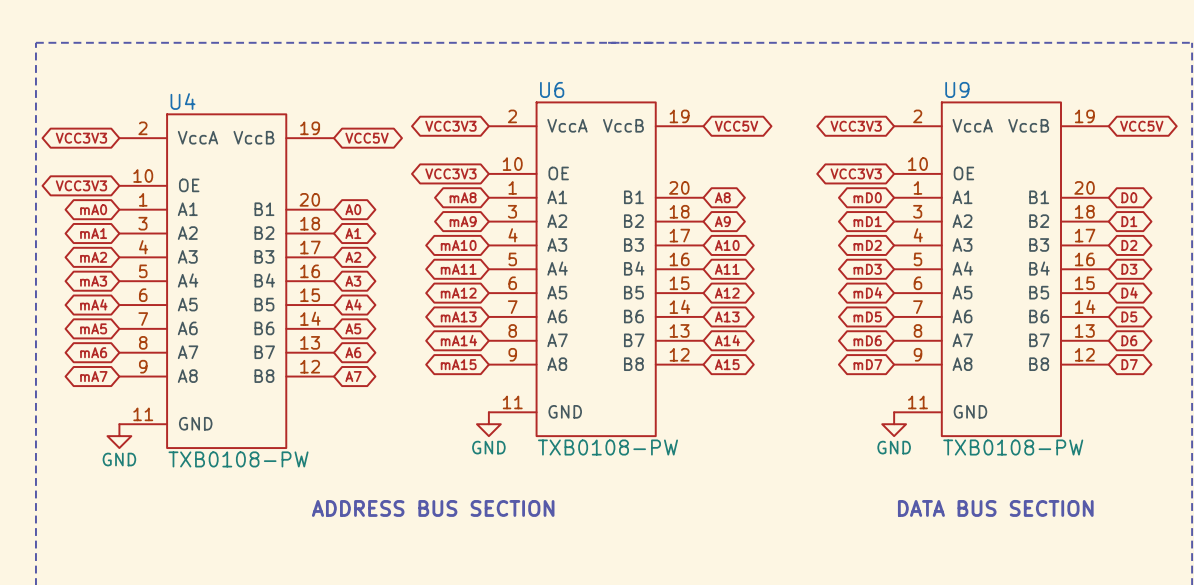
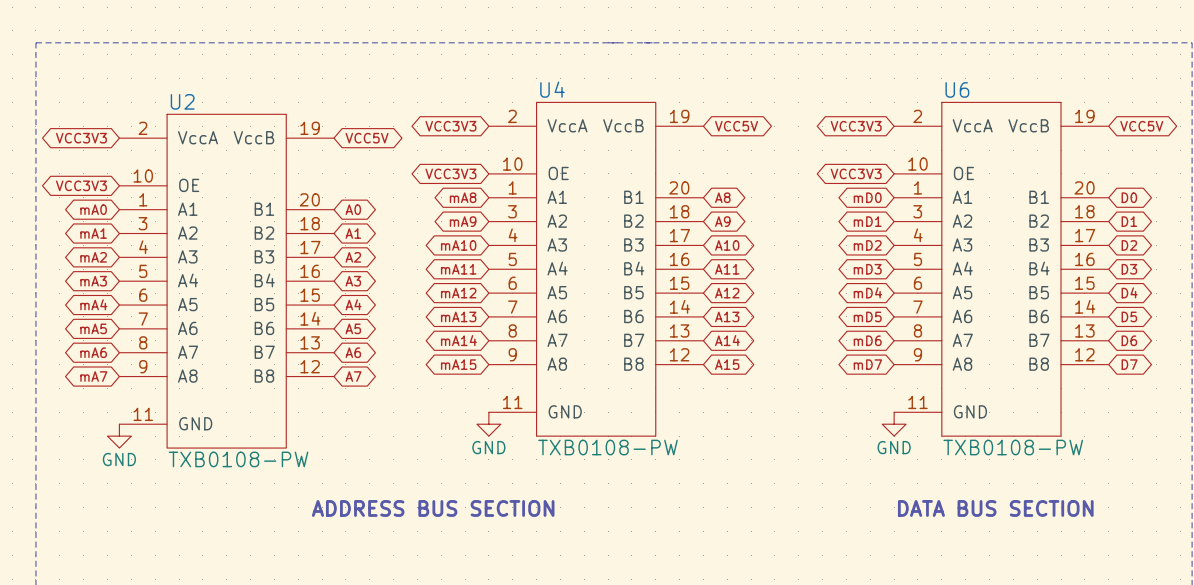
U6 name: U6 (552, 89) -> U4 (552, 89)
U9 name: U9 (957, 89) -> U6 (957, 89)
U4 name: U4 (183, 101) -> U2 (182, 101)

